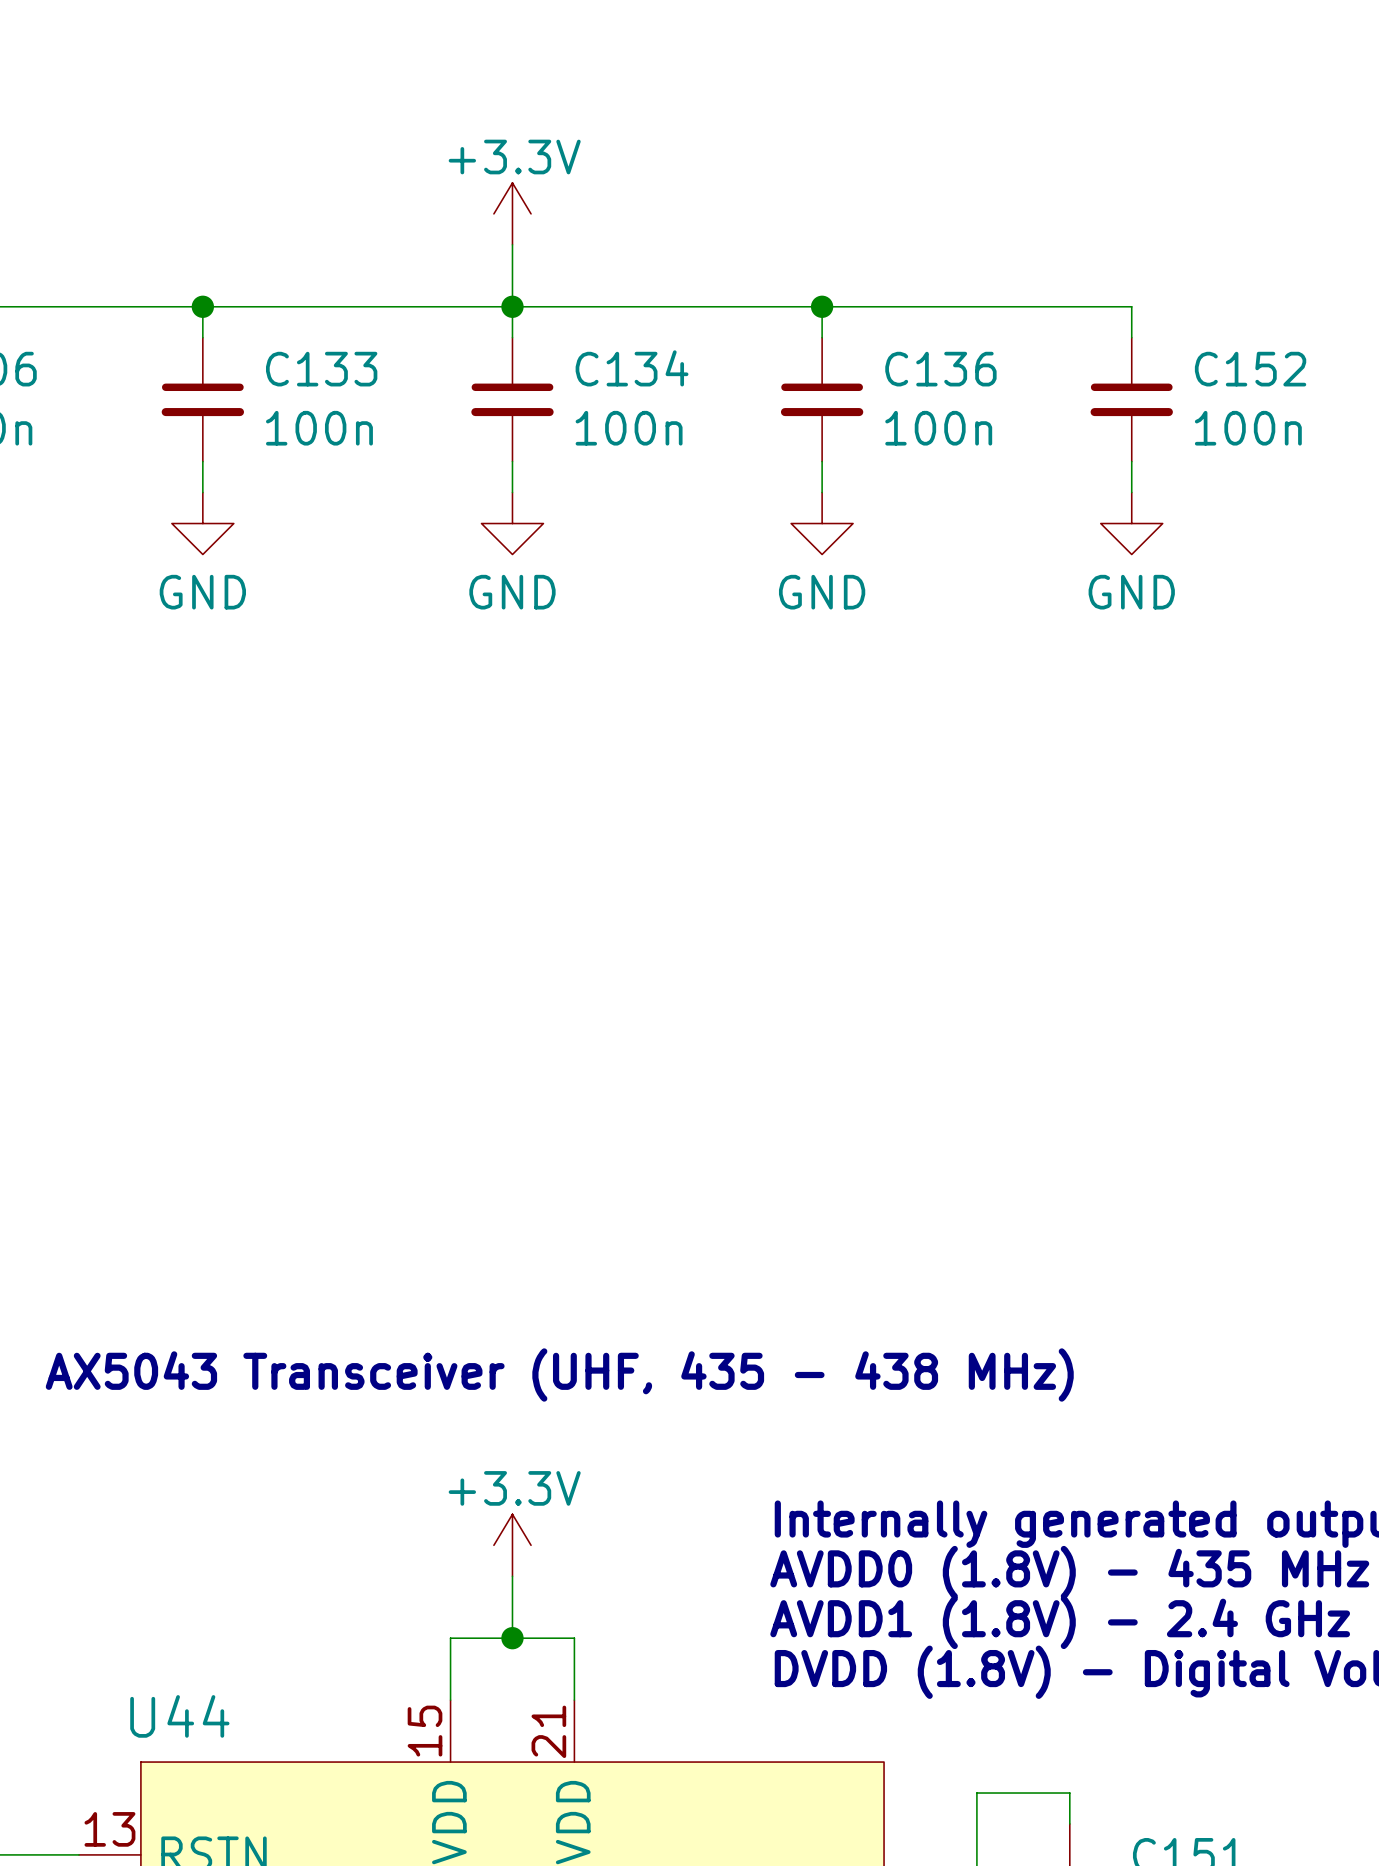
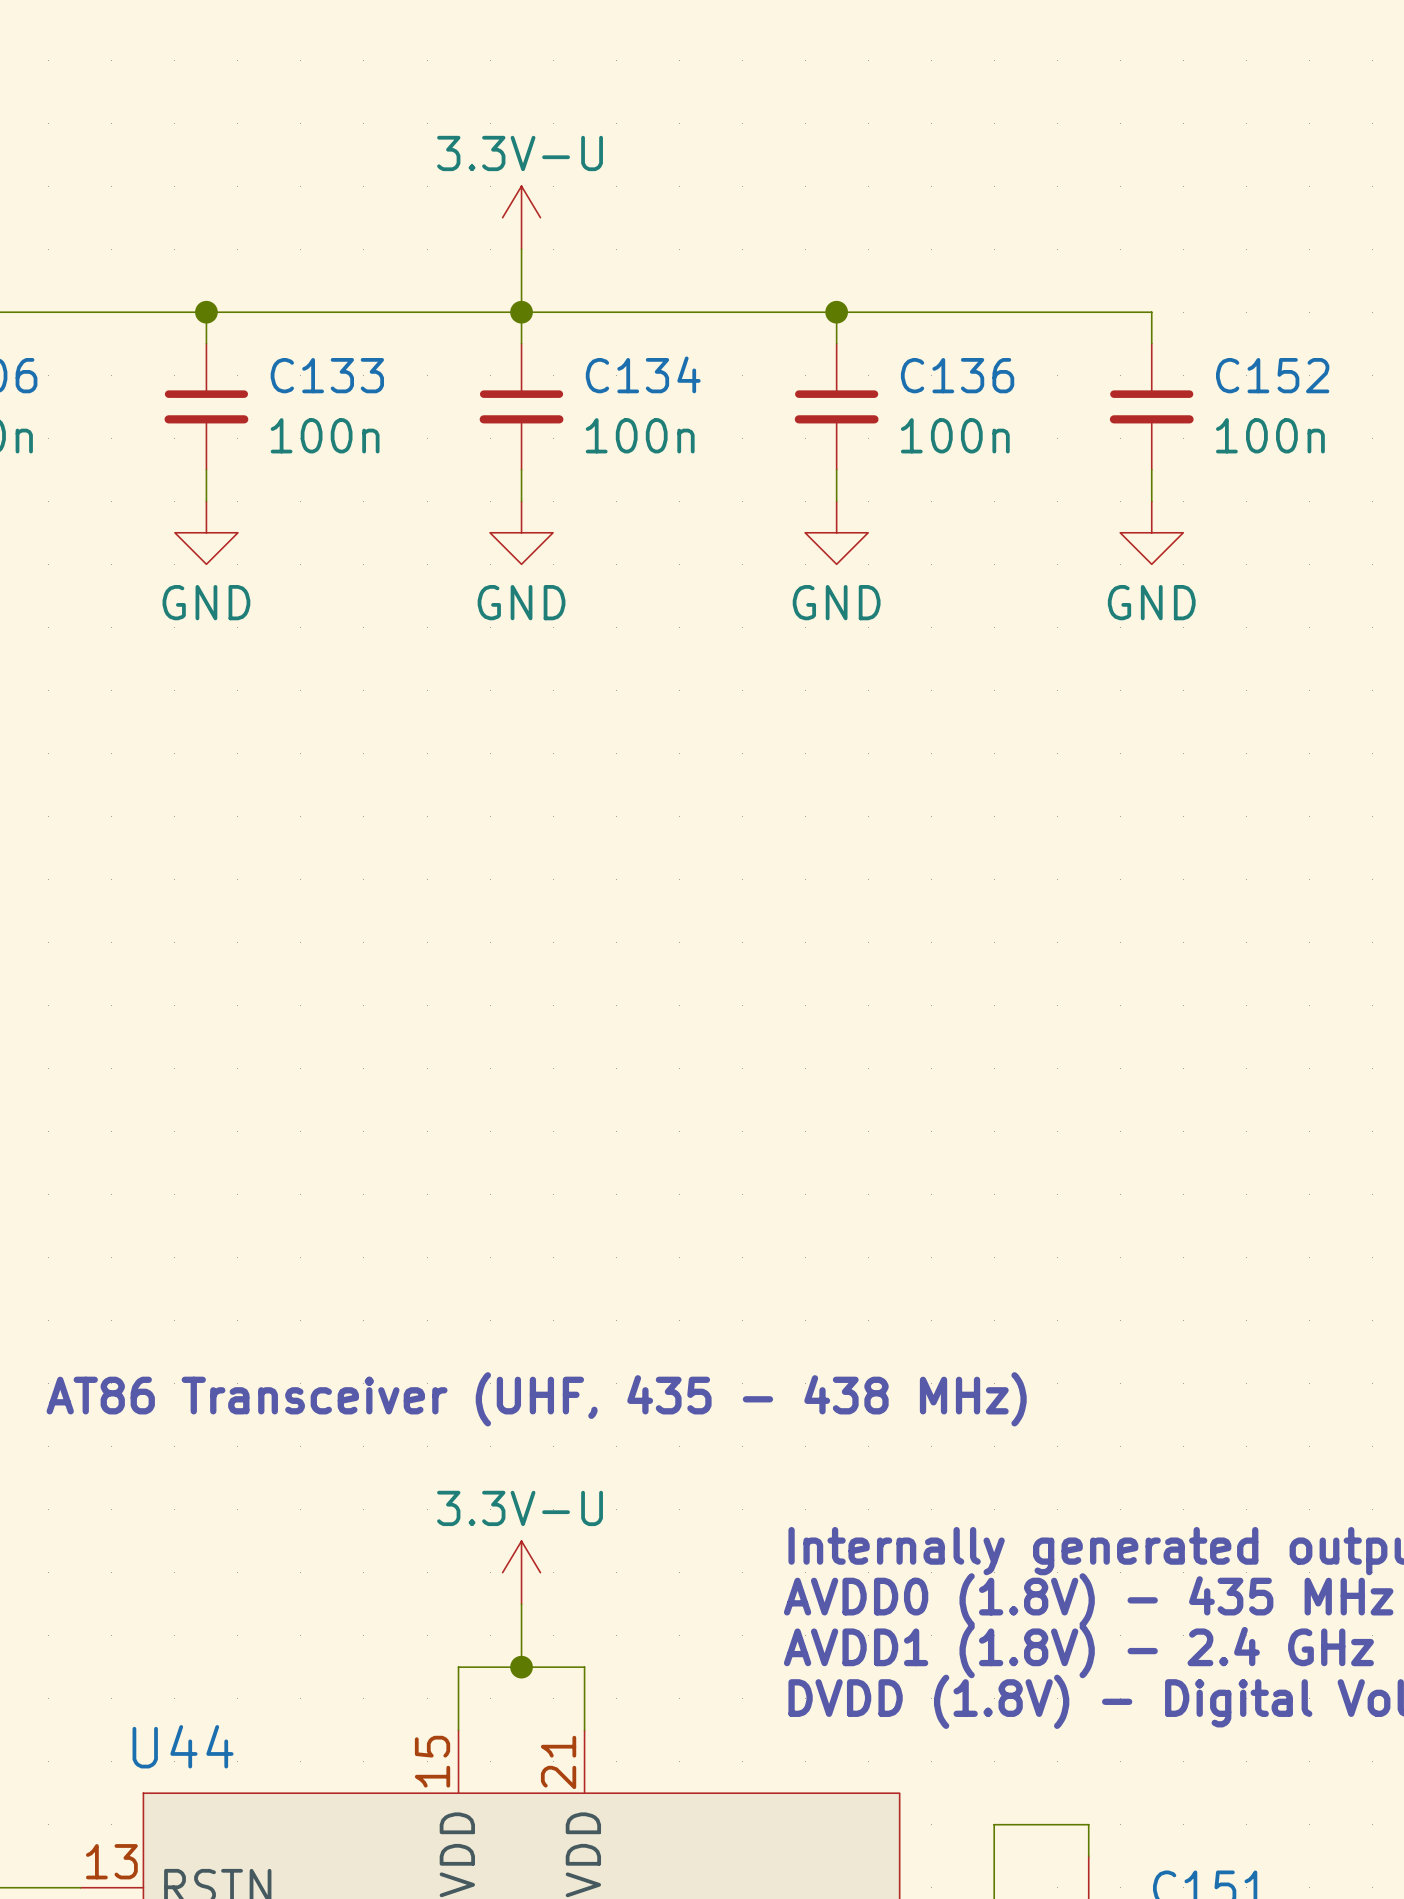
power symbol: +3.3V (512, 213) -> 3.3V-U (521, 217)
text: AX5043 Transceiver (UHF, 435 - 438 MHz) (559, 1375) -> AT86 Transceiver (UHF, 435 - 438 MHz) (536, 1399)
power symbol: +3.3V (512, 1545) -> 3.3V-U (521, 1572)

